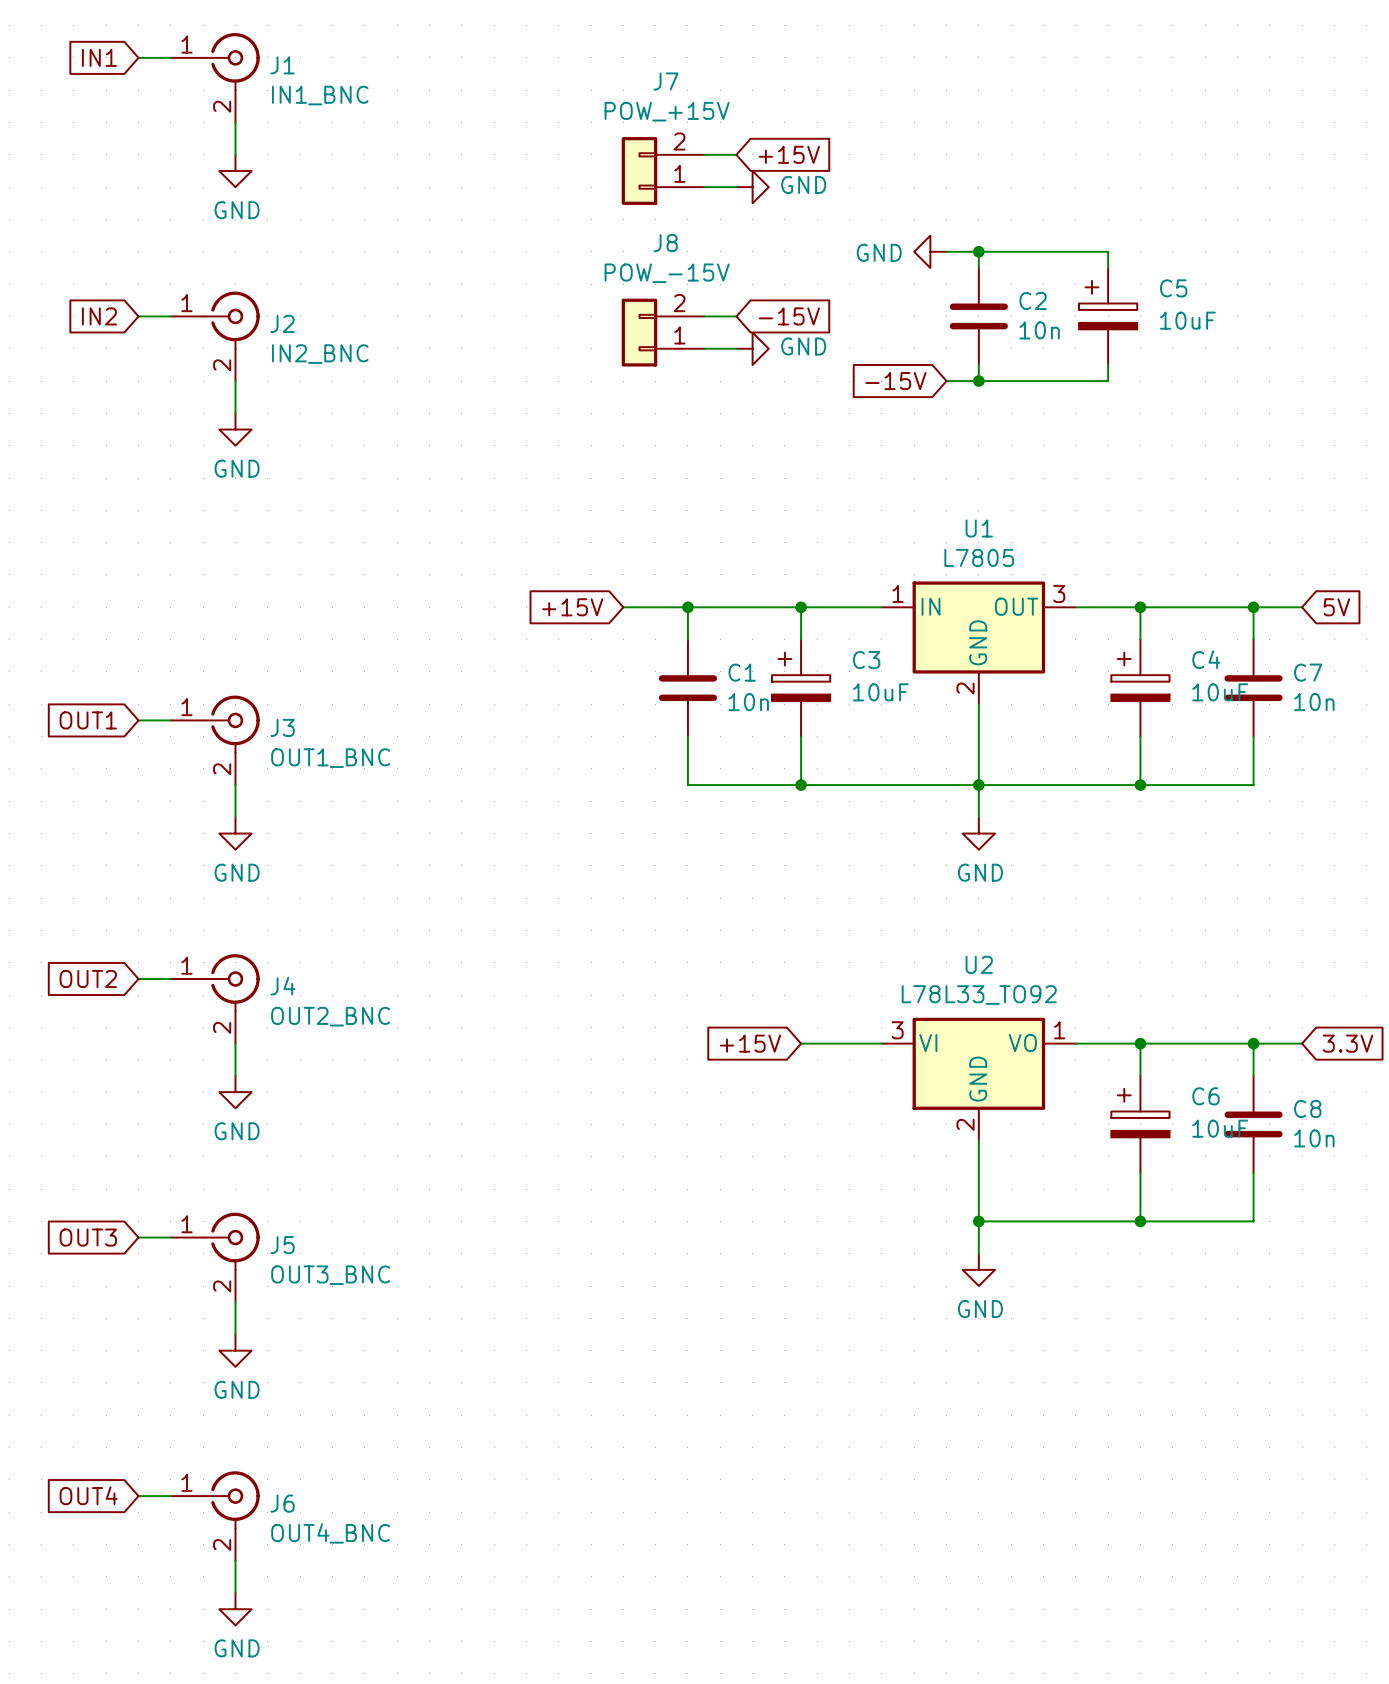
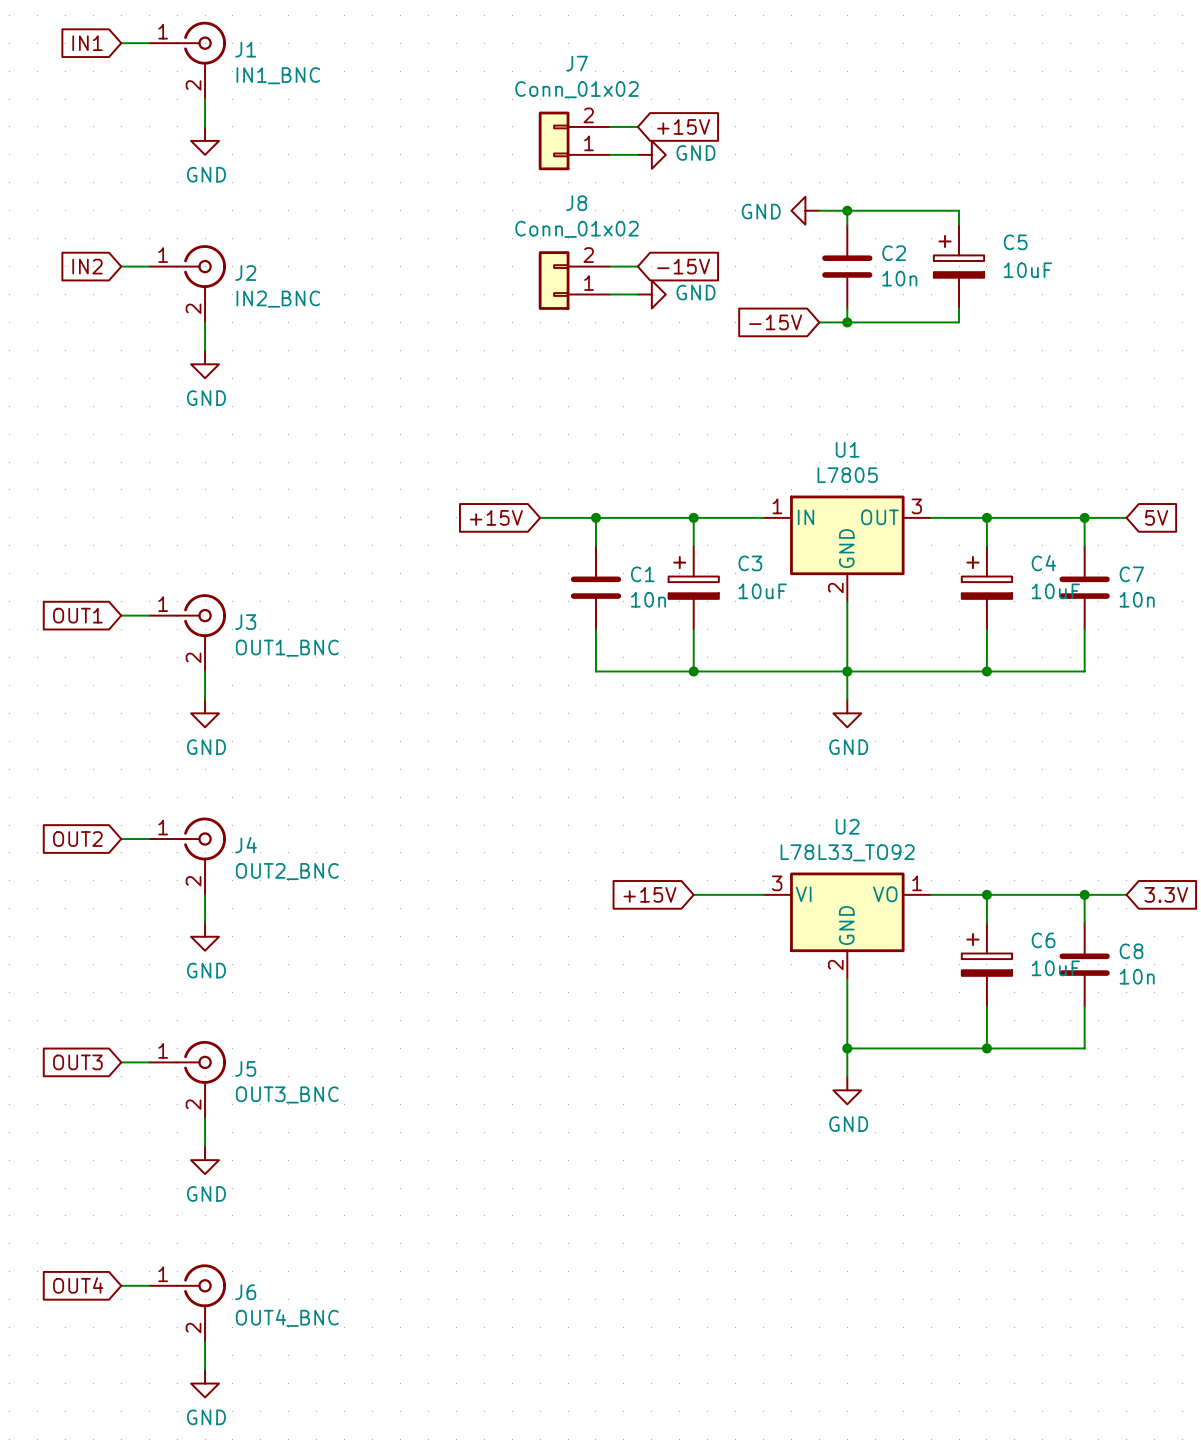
J7 value: POW_+15V (667, 111) -> Conn_01x02 (576, 89)
J8 value: POW_-15V (667, 273) -> Conn_01x02 (576, 229)

